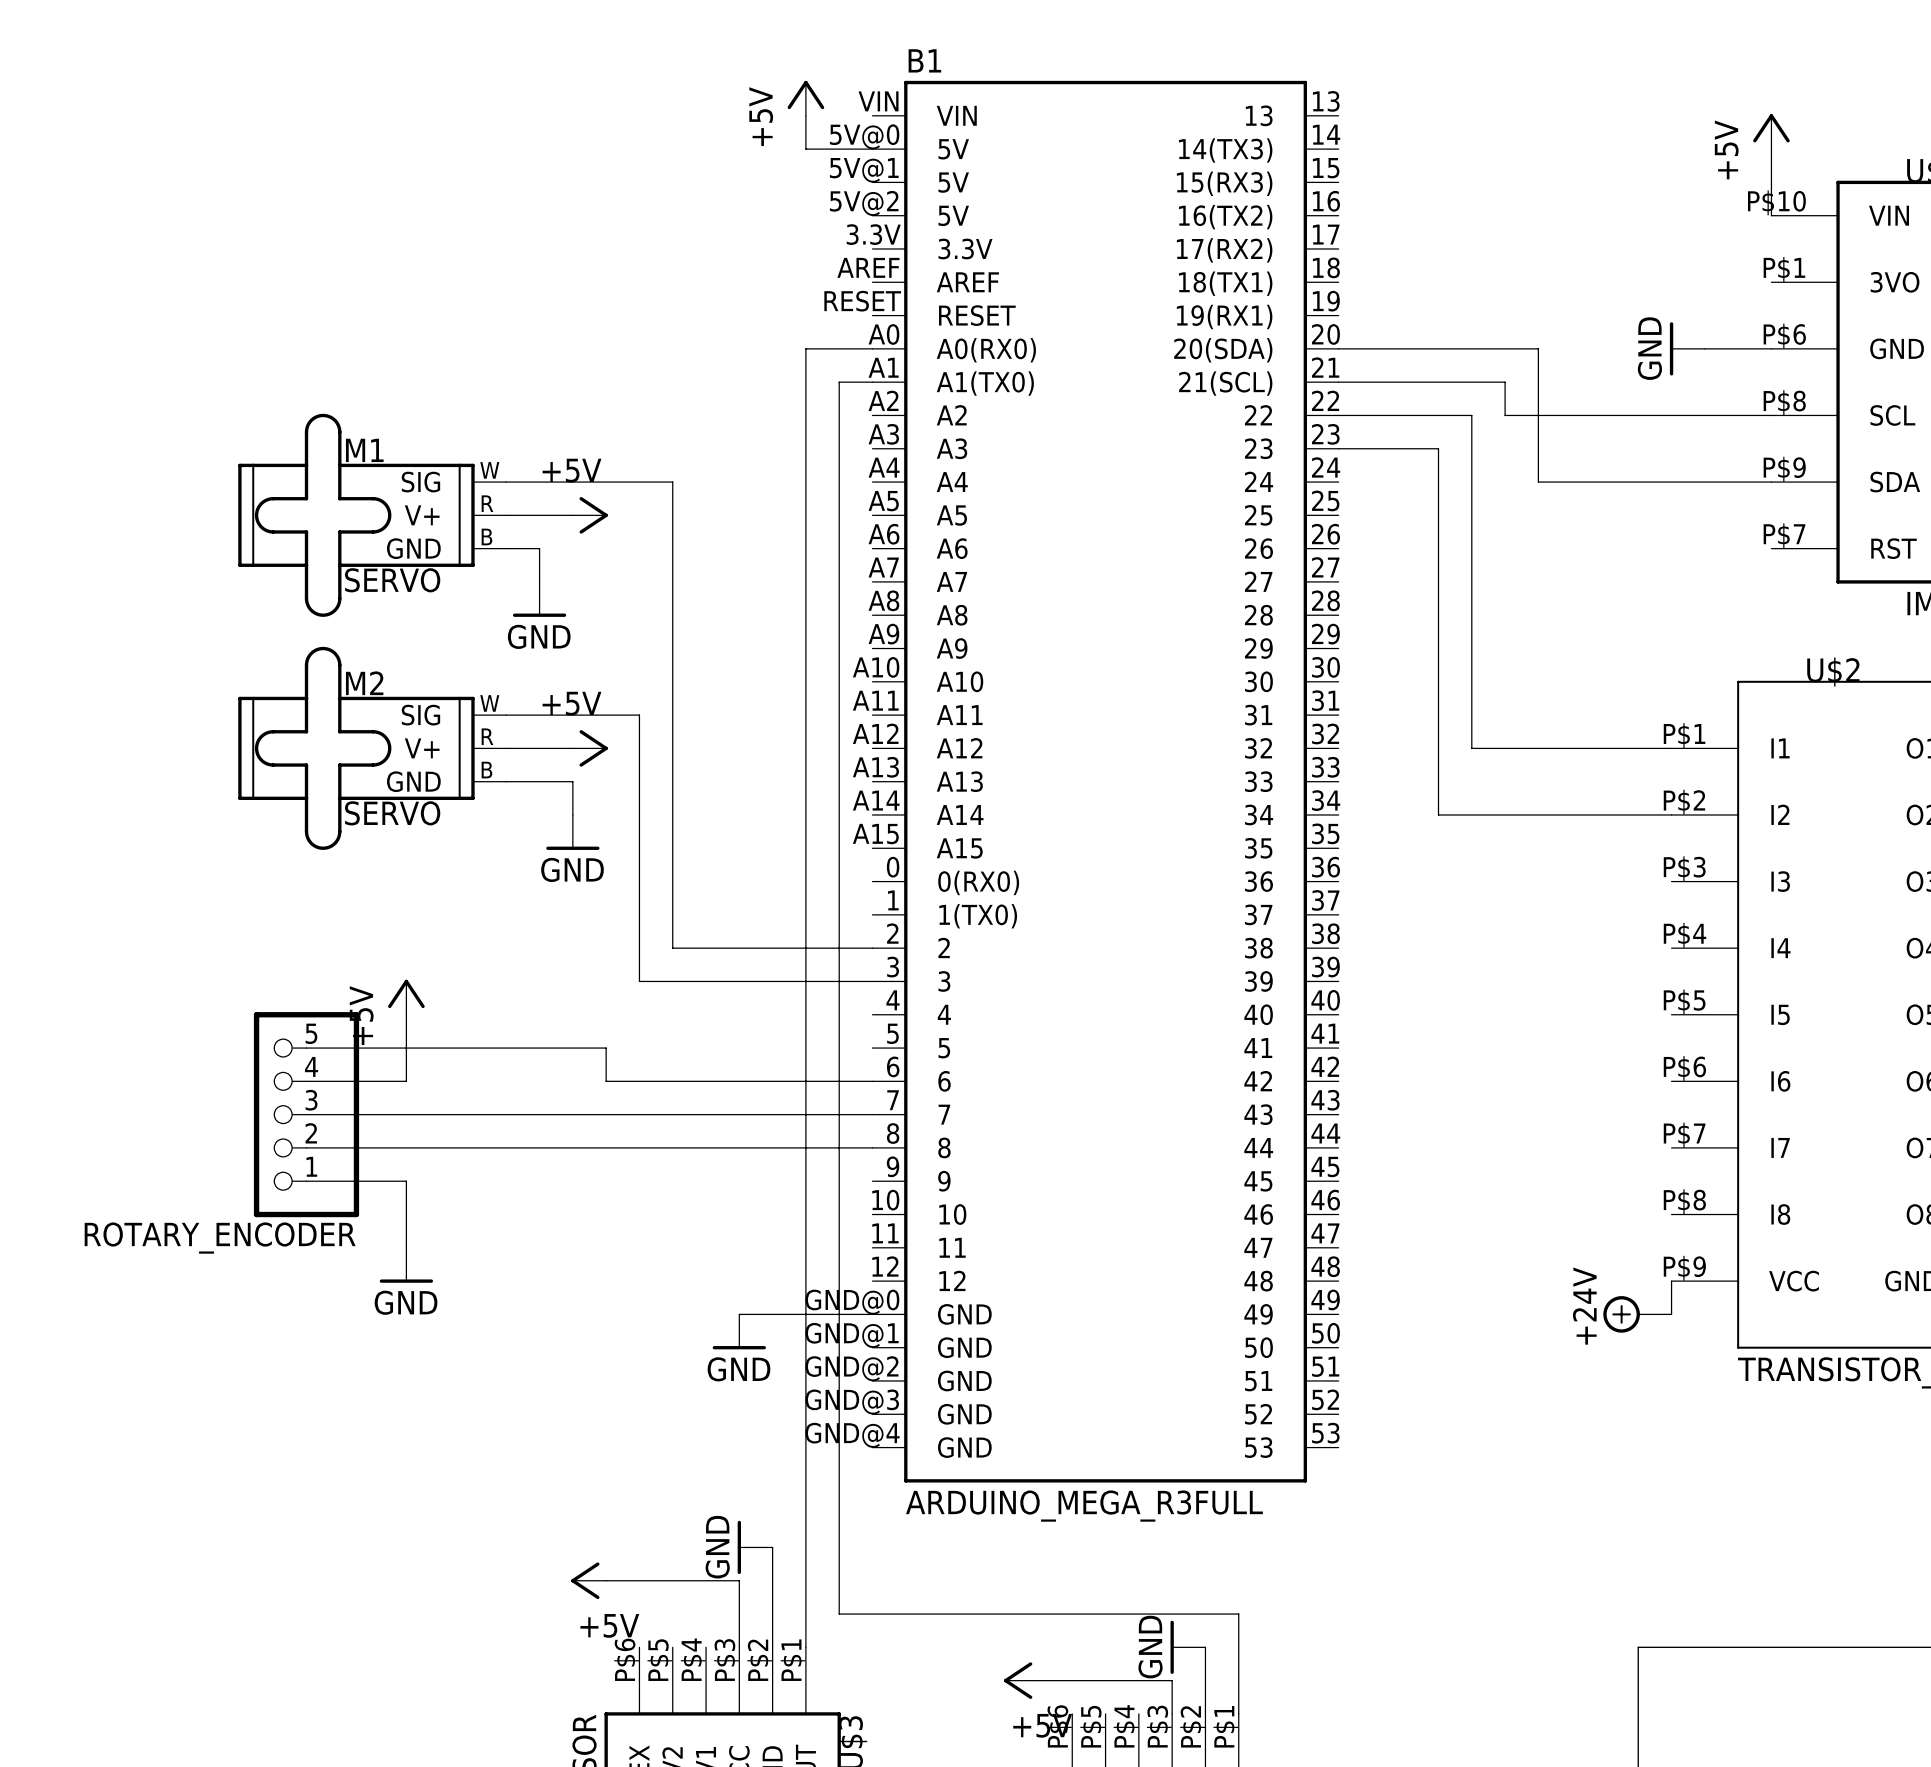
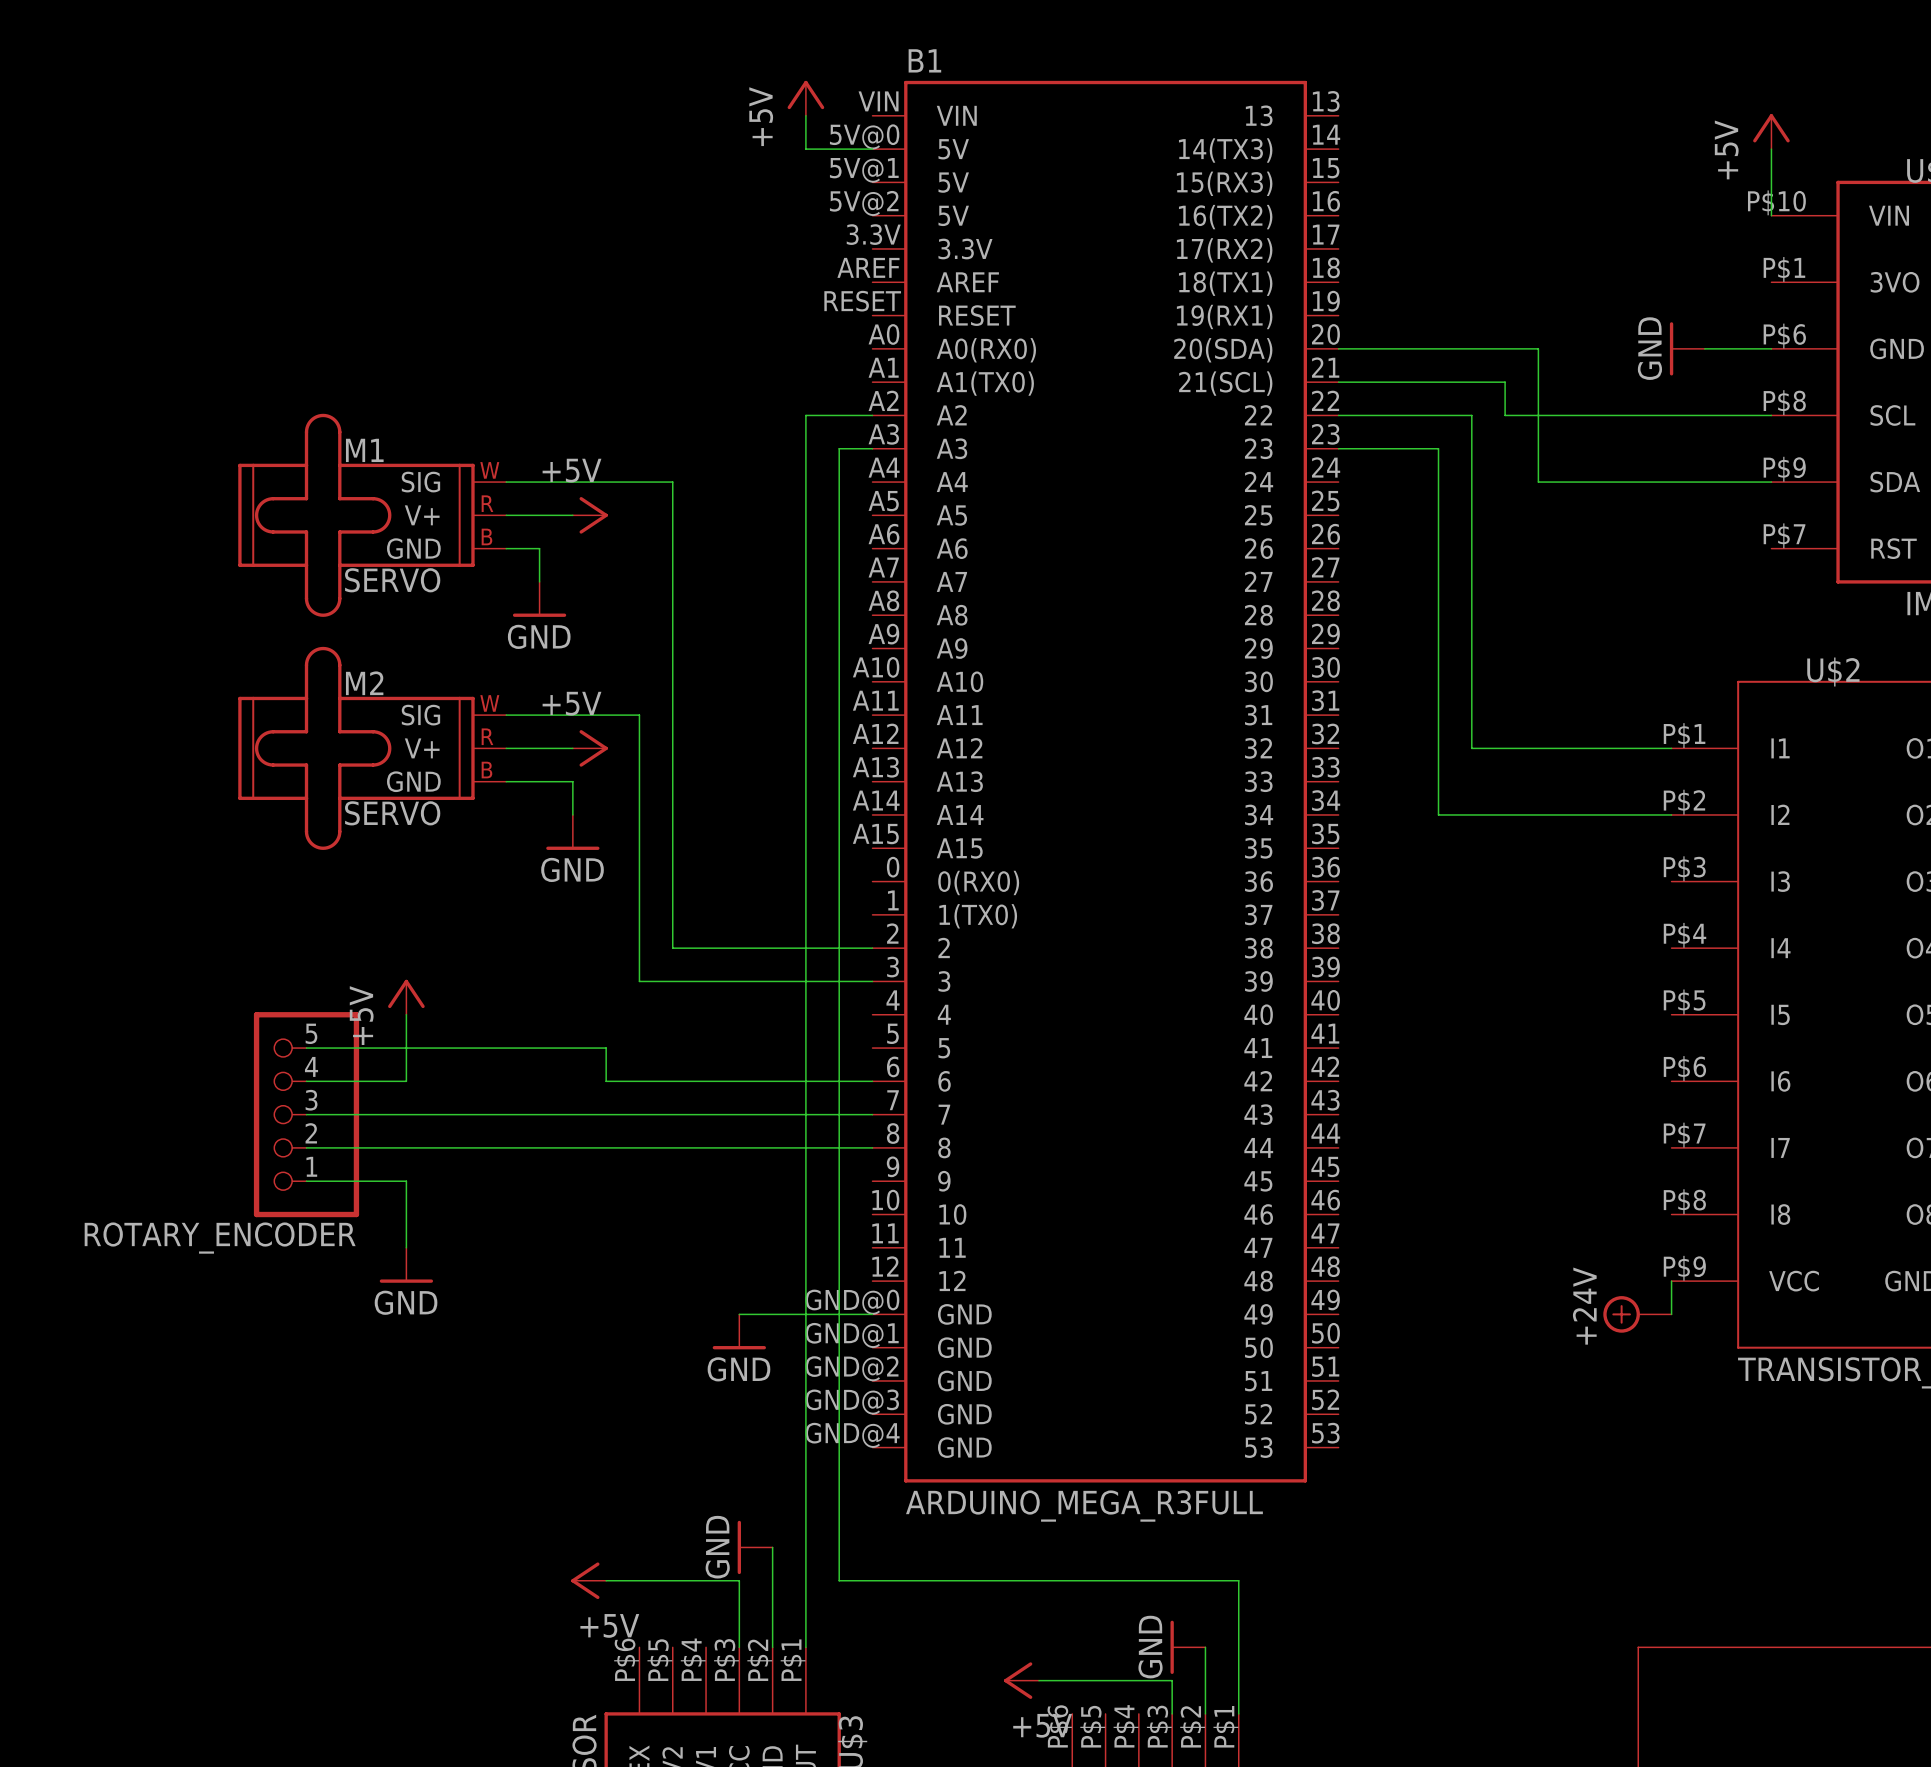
wire: (872, 348) (805, 348) (805, 415) -> (872, 415) (805, 415)
wire: (872, 382) (839, 382) (839, 448) -> (872, 448) (839, 448)
wire: (839, 1580) (839, 1614) (1238, 1614) -> (839, 1580) (1238, 1580) (1238, 1614)

